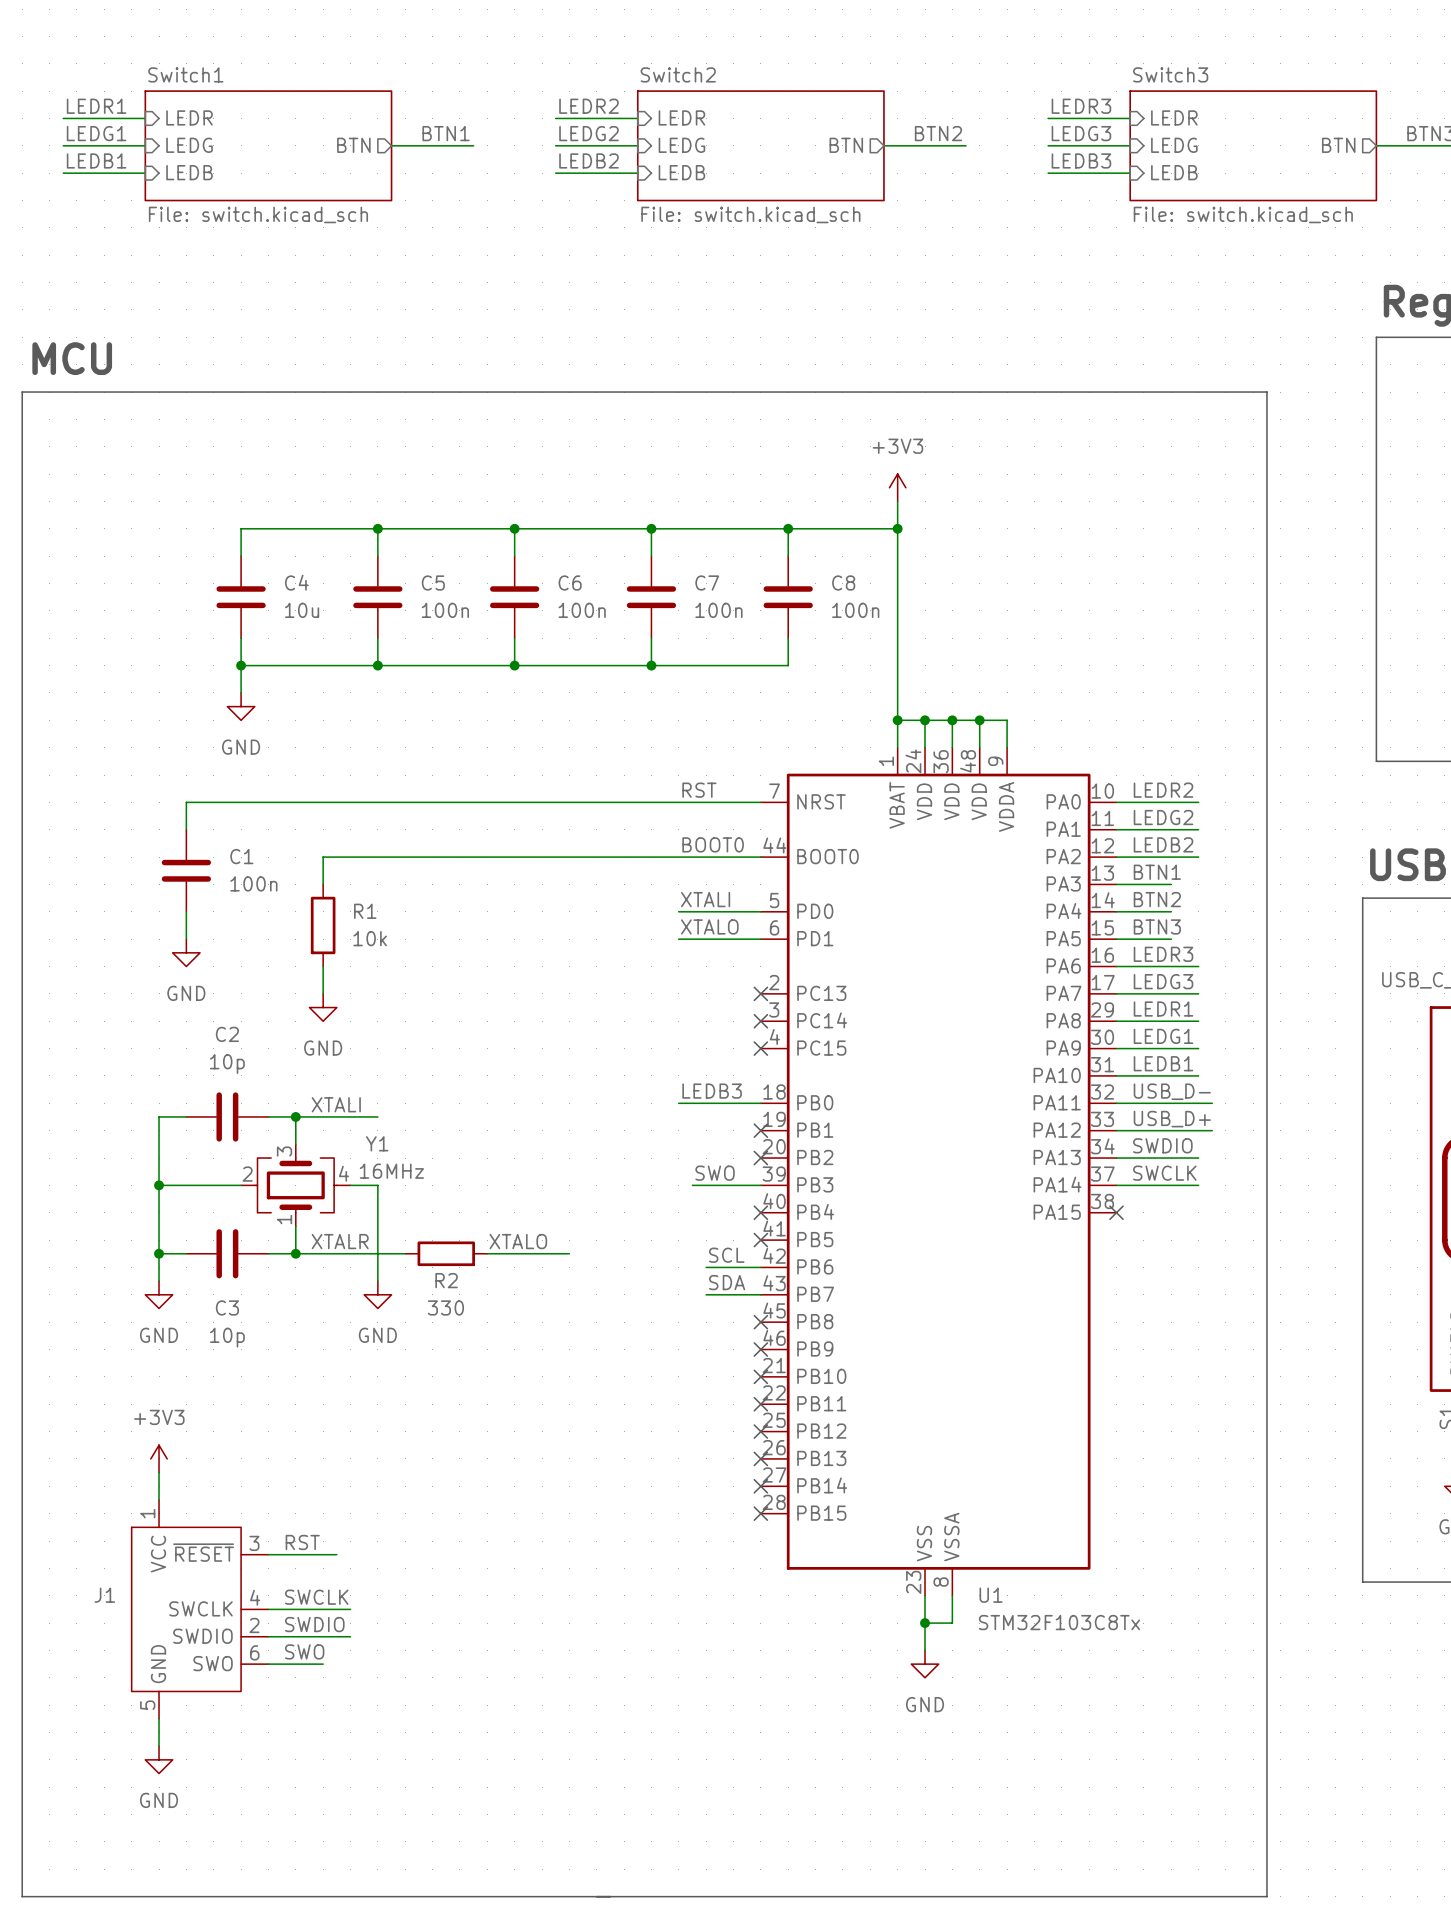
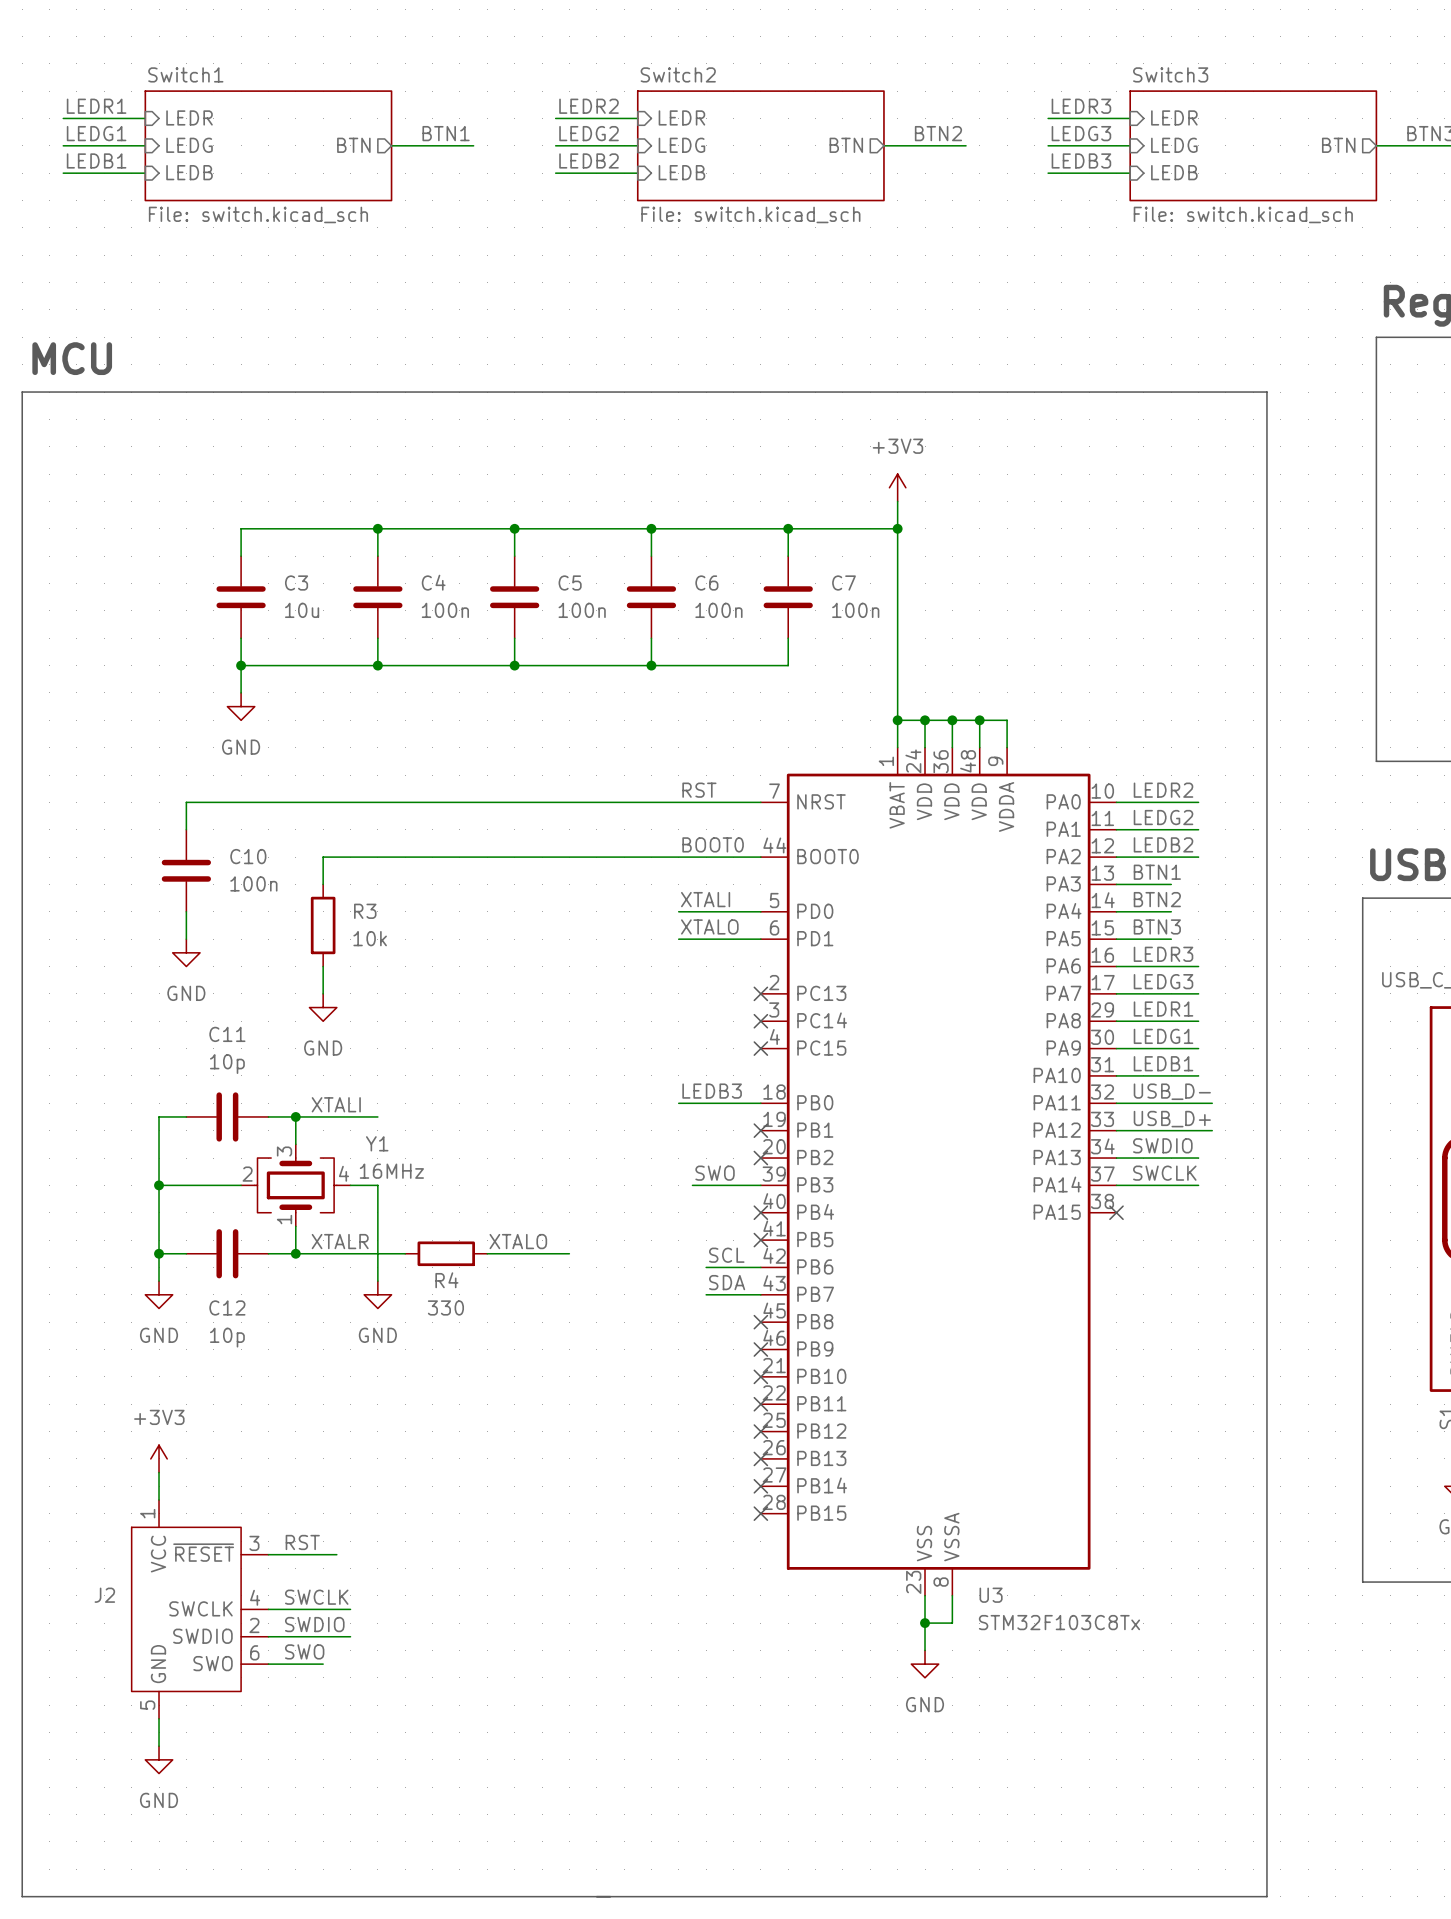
C4 name: C4 (296, 582) -> C3 (296, 583)
C5 name: C5 (433, 583) -> C4 (433, 582)
C6 name: C6 (570, 583) -> C5 (570, 583)
C7 name: C7 (707, 583) -> C6 (706, 583)
C8 name: C8 (843, 583) -> C7 (844, 583)
C1 name: C1 (241, 856) -> C10 (248, 856)
R1 name: R1 (365, 911) -> R3 (365, 911)
C2 name: C2 (227, 1034) -> C11 (227, 1034)
R2 name: R2 (446, 1280) -> R4 (446, 1280)
C3 name: C3 (227, 1307) -> C12 (227, 1307)
J1 name: J1 (104, 1595) -> J2 (104, 1595)
U1 name: U1 (991, 1595) -> U3 (991, 1595)

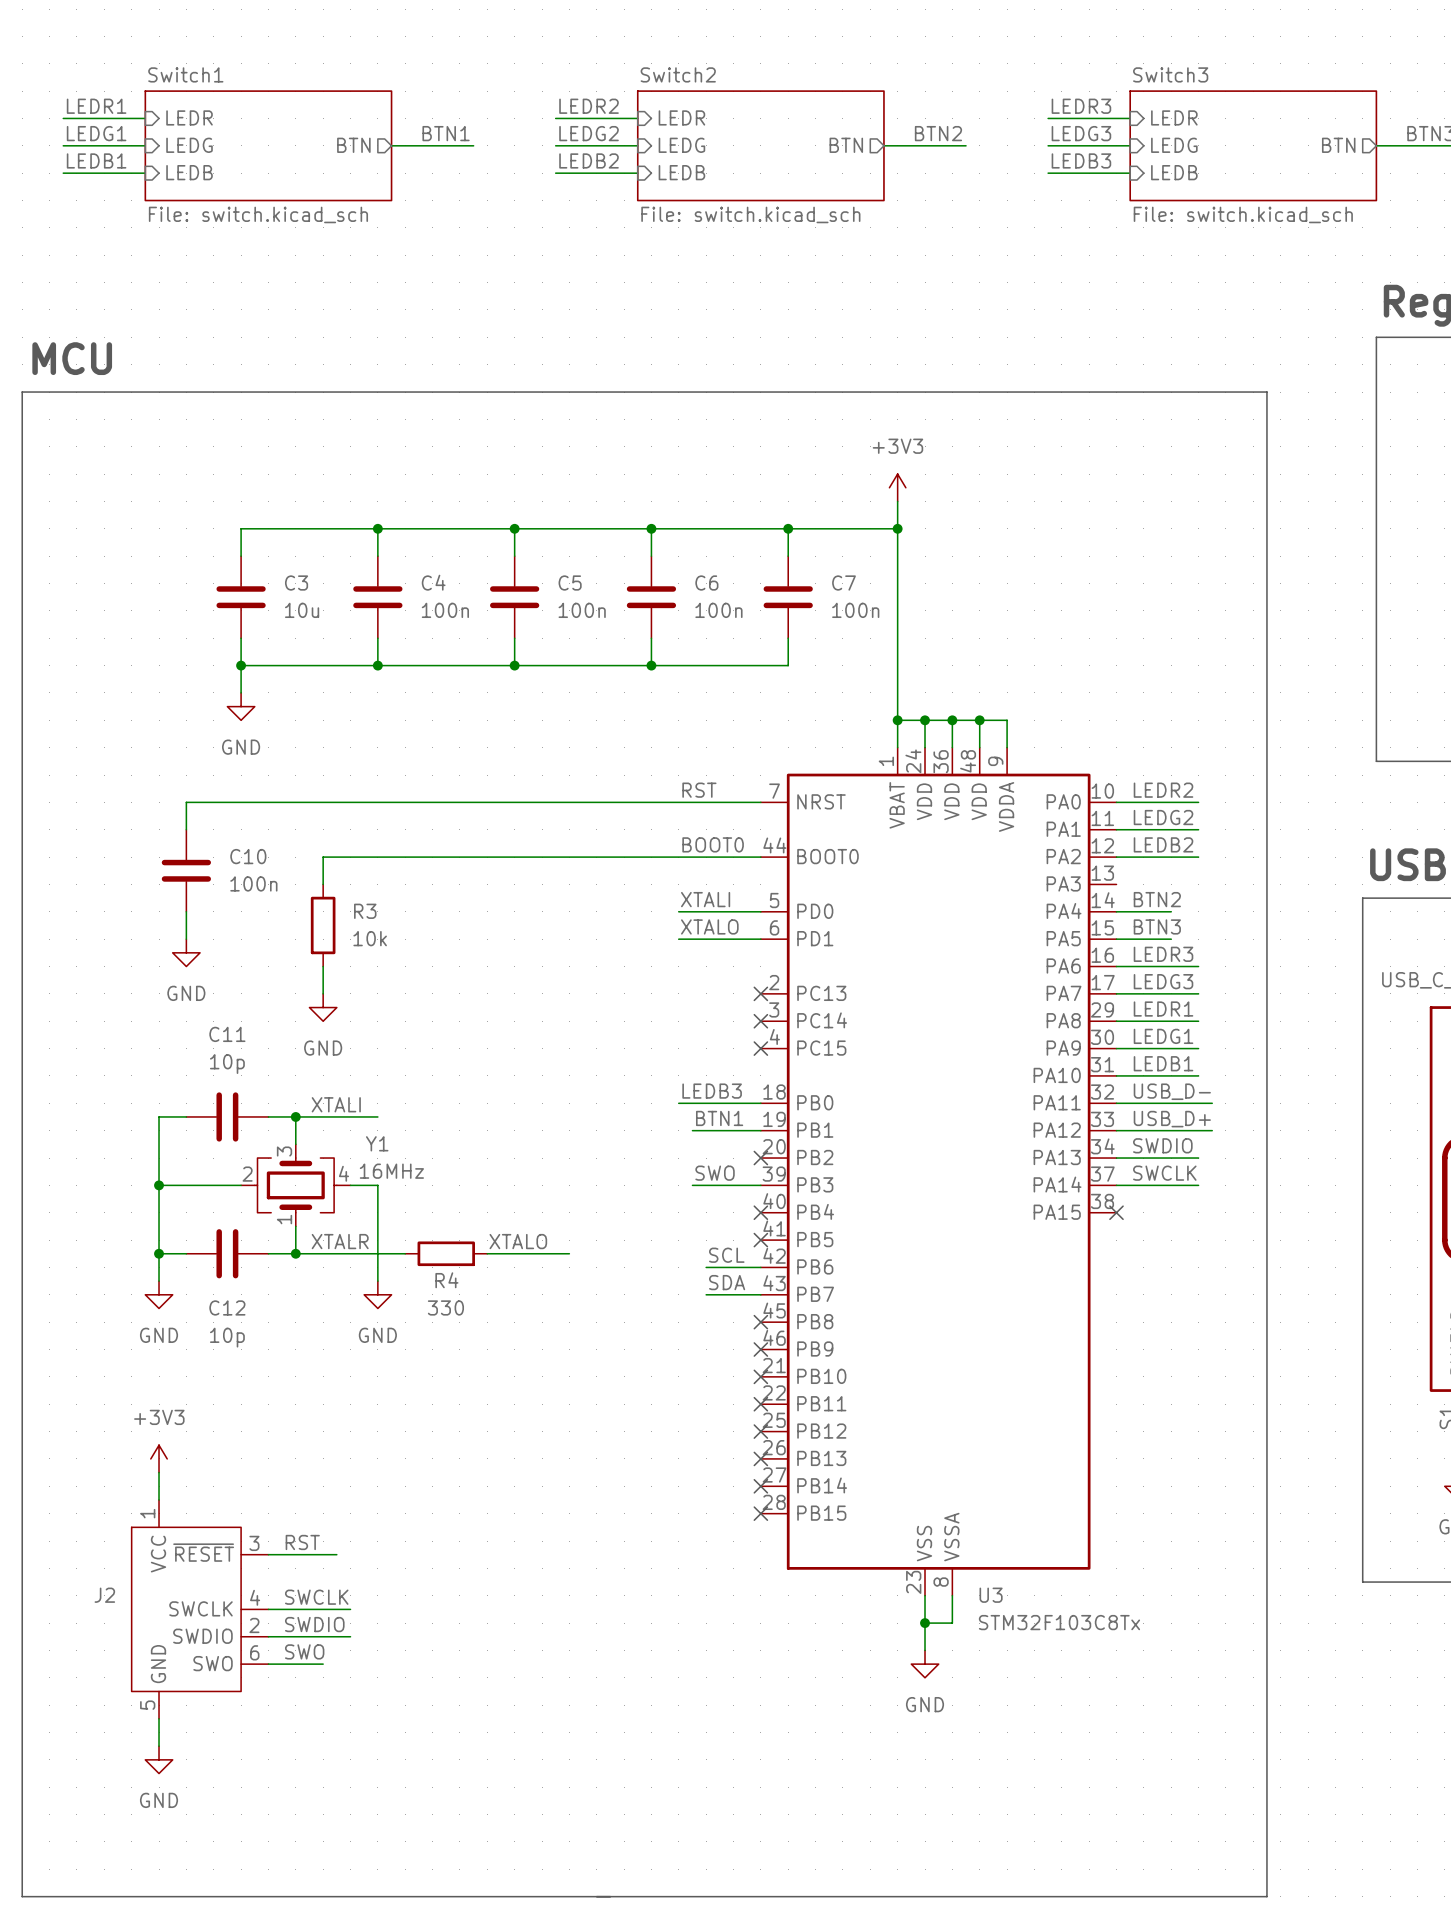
label: BTN1 (1157, 872) -> none
wire: (1116, 884) (1171, 884) -> none
label: none -> BTN1 (719, 1118)
wire: none -> (692, 1130) (760, 1130)
no-connect mark: (760, 1130) -> none

